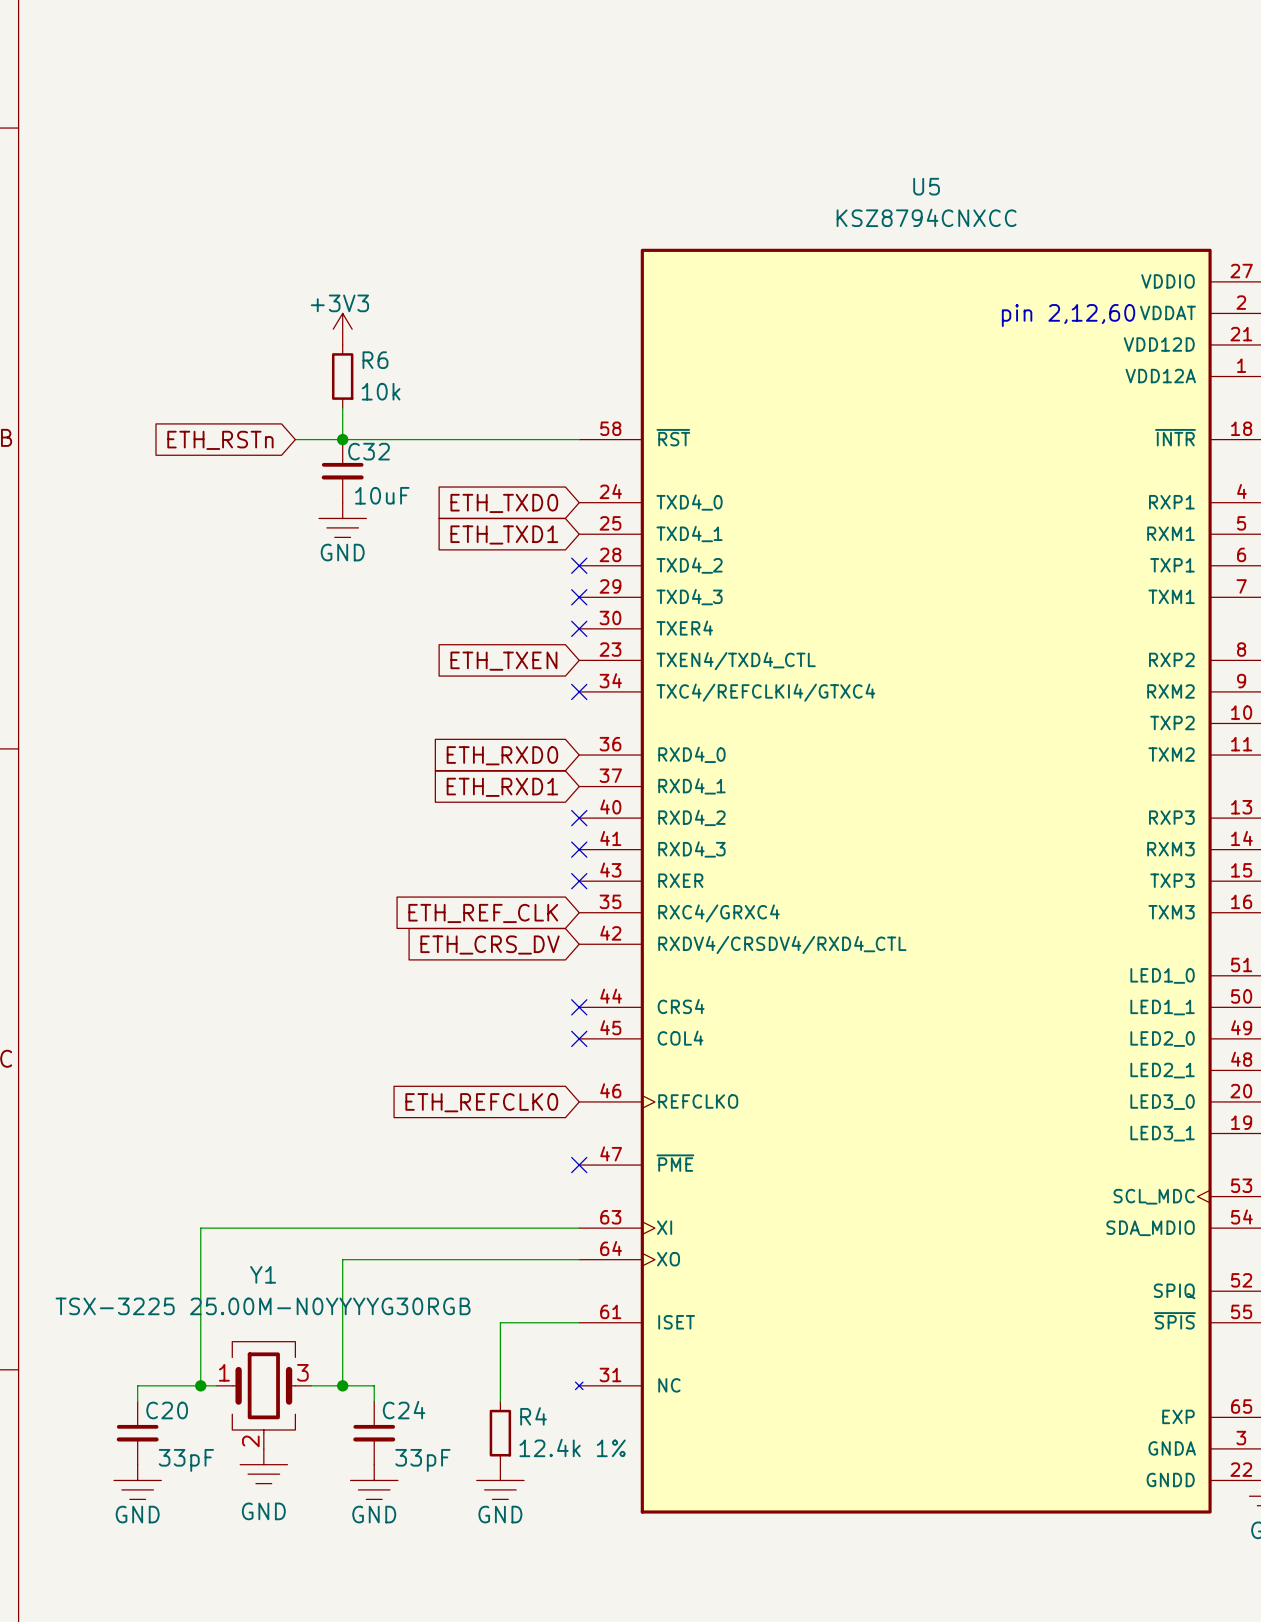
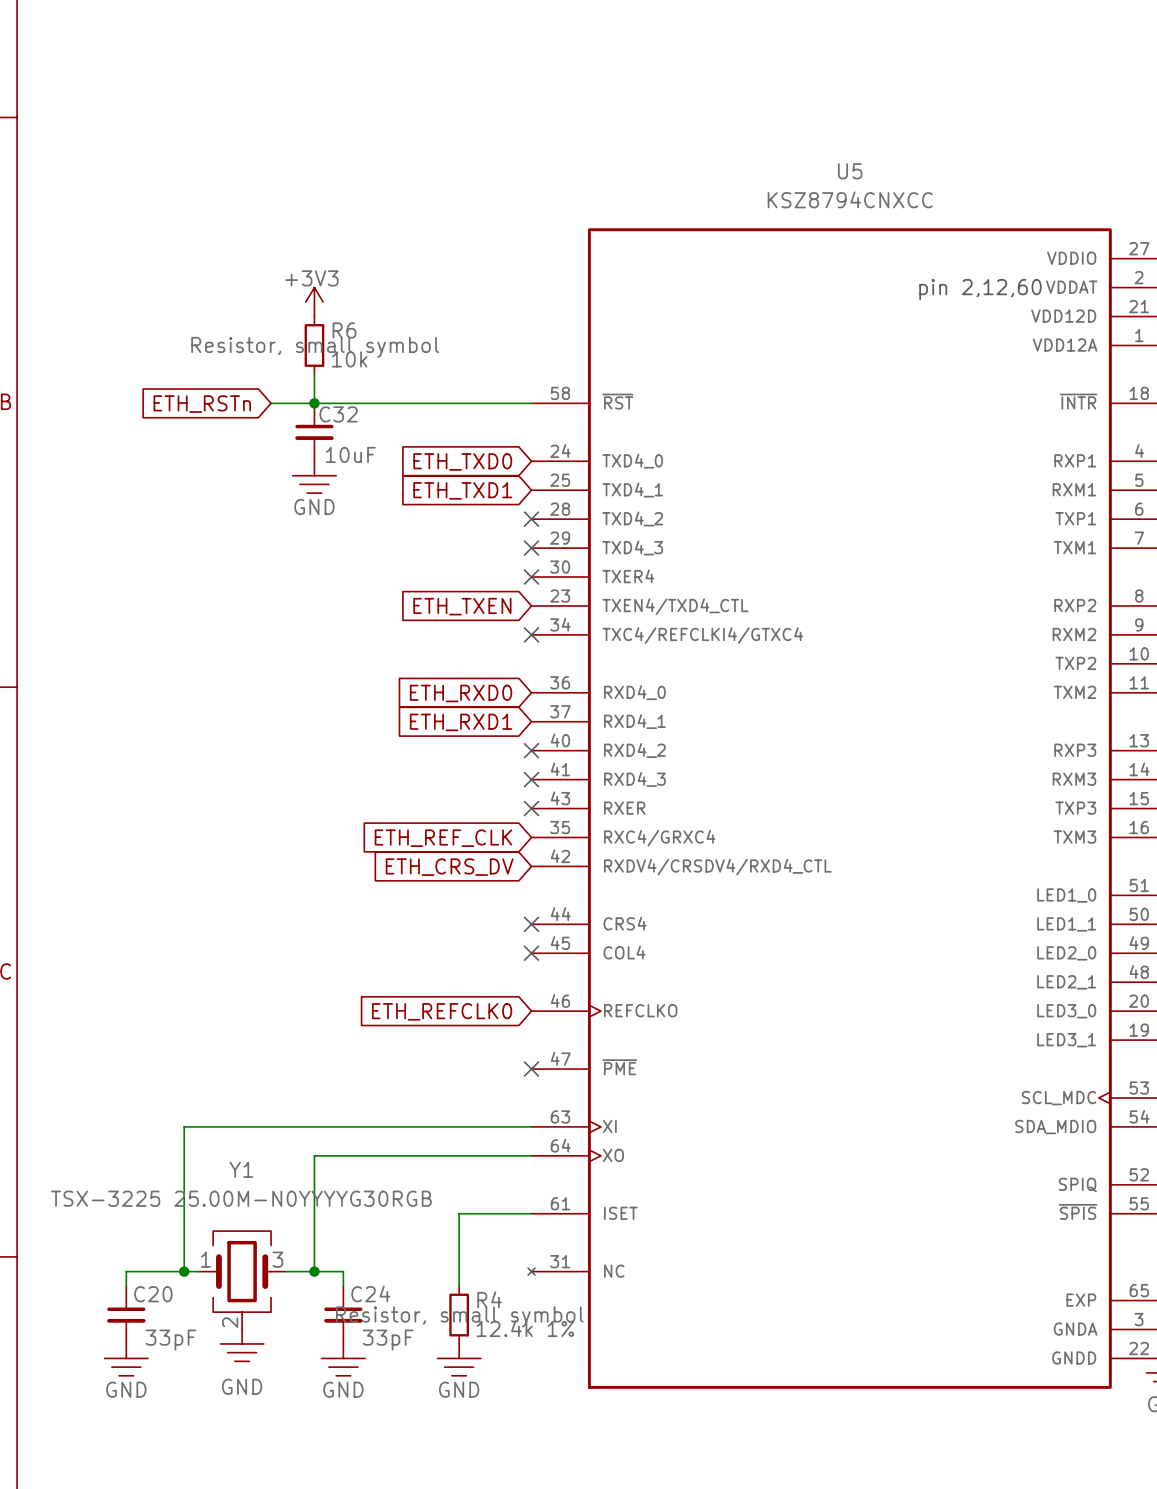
R6 text: none -> Resistor, small symbol (315, 347)
R4 text: none -> Resistor, small symbol (459, 1316)

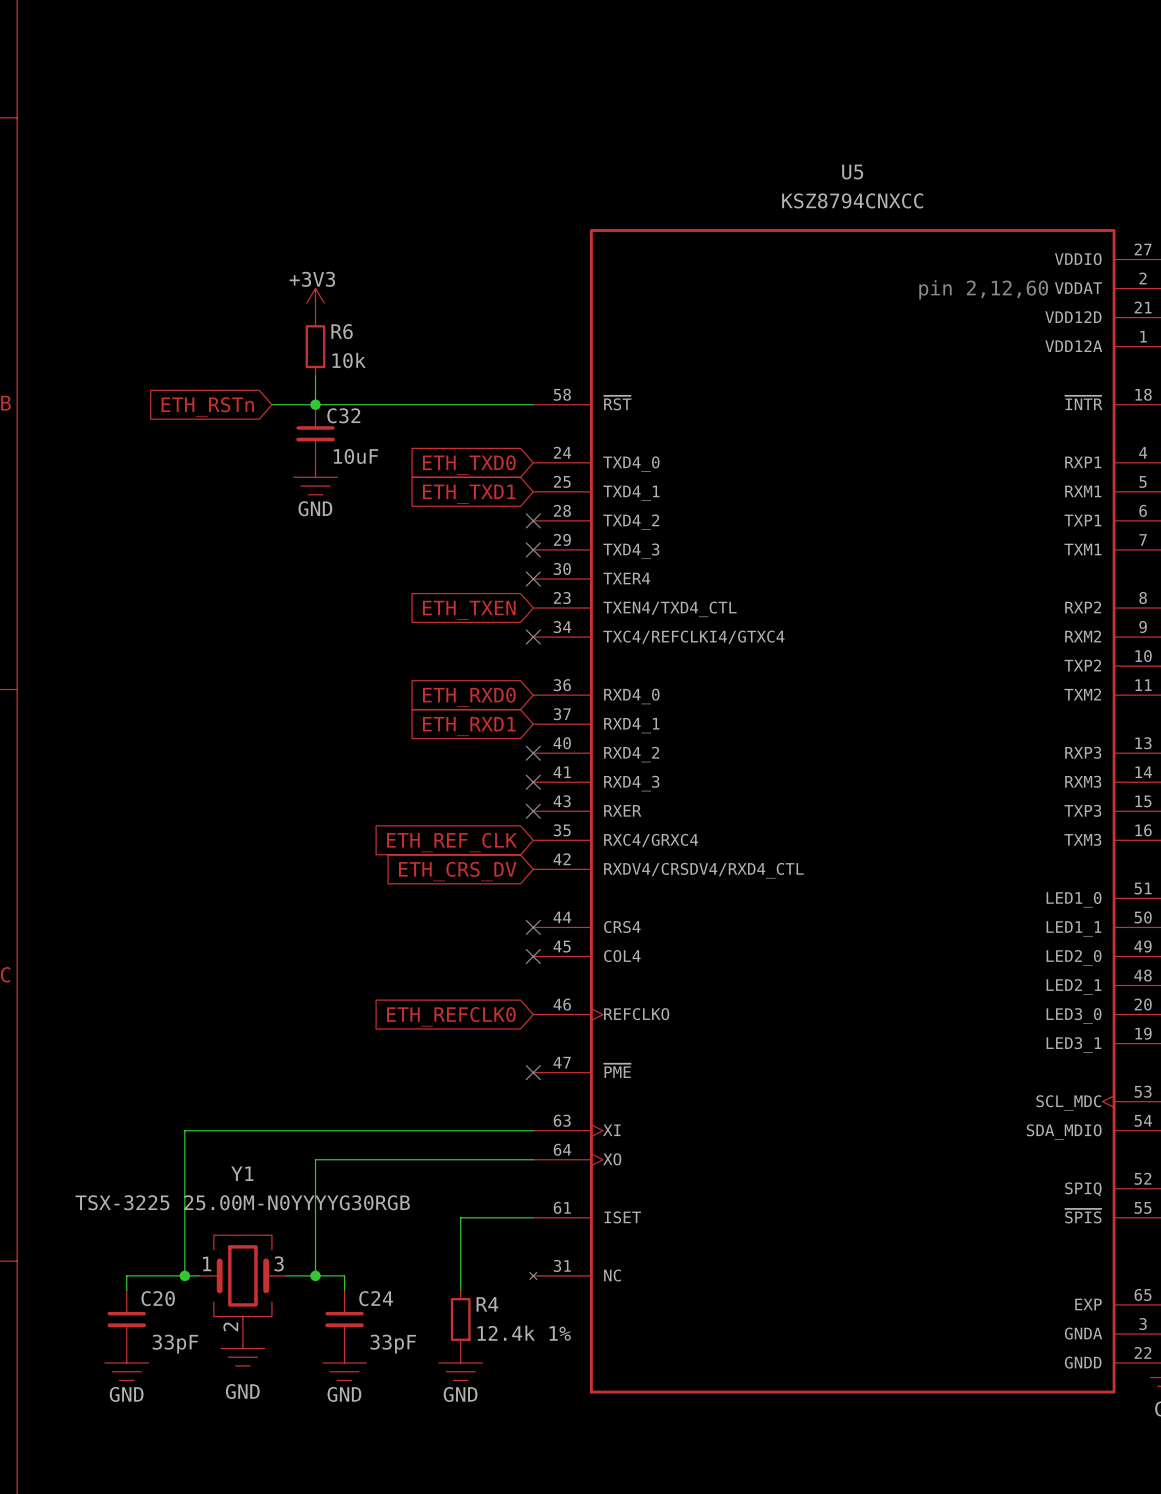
R6 text: Resistor, small symbol (315, 347) -> none
R4 text: Resistor, small symbol (459, 1316) -> none

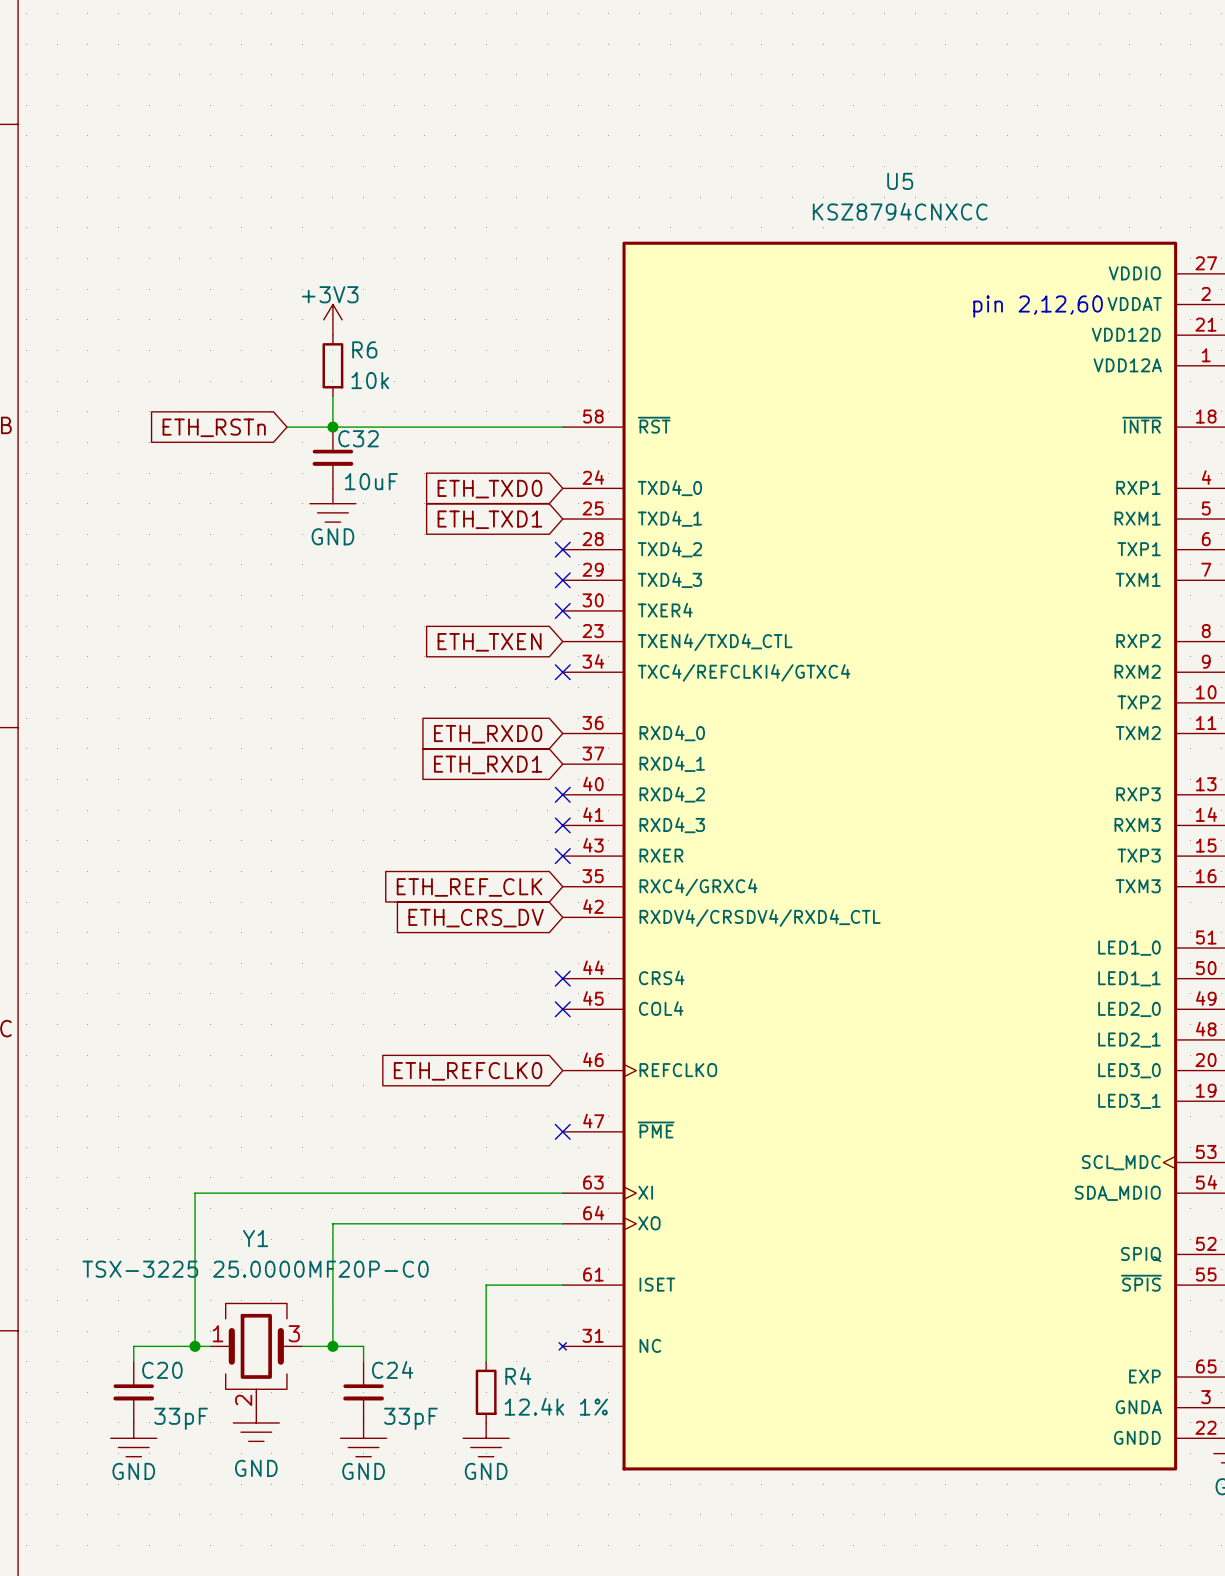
Y1 value: TSX-3225 25.00M-N0YYYYG30RGB (242, 1202) -> TSX-3225 25.0000MF20P-C0 (255, 1269)

